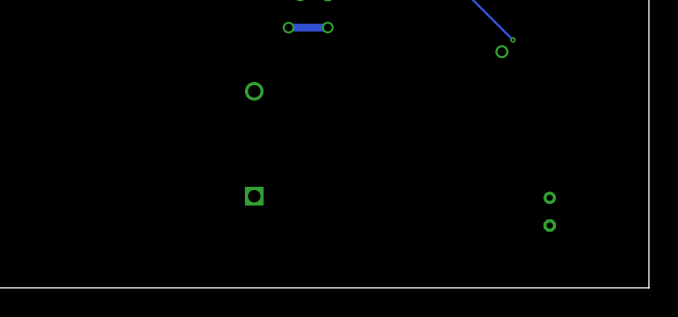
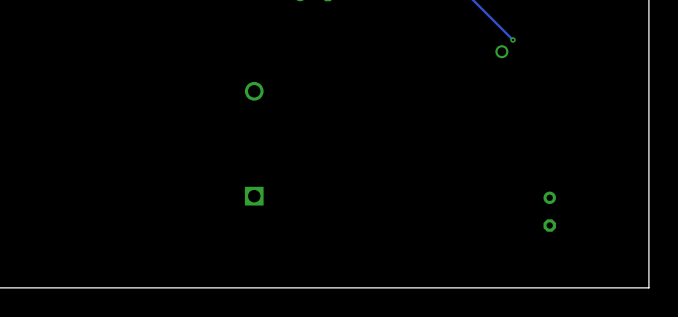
via: (288, 27) -> none
track: (327, 27) (288, 27) -> none
via: (327, 27) -> none

